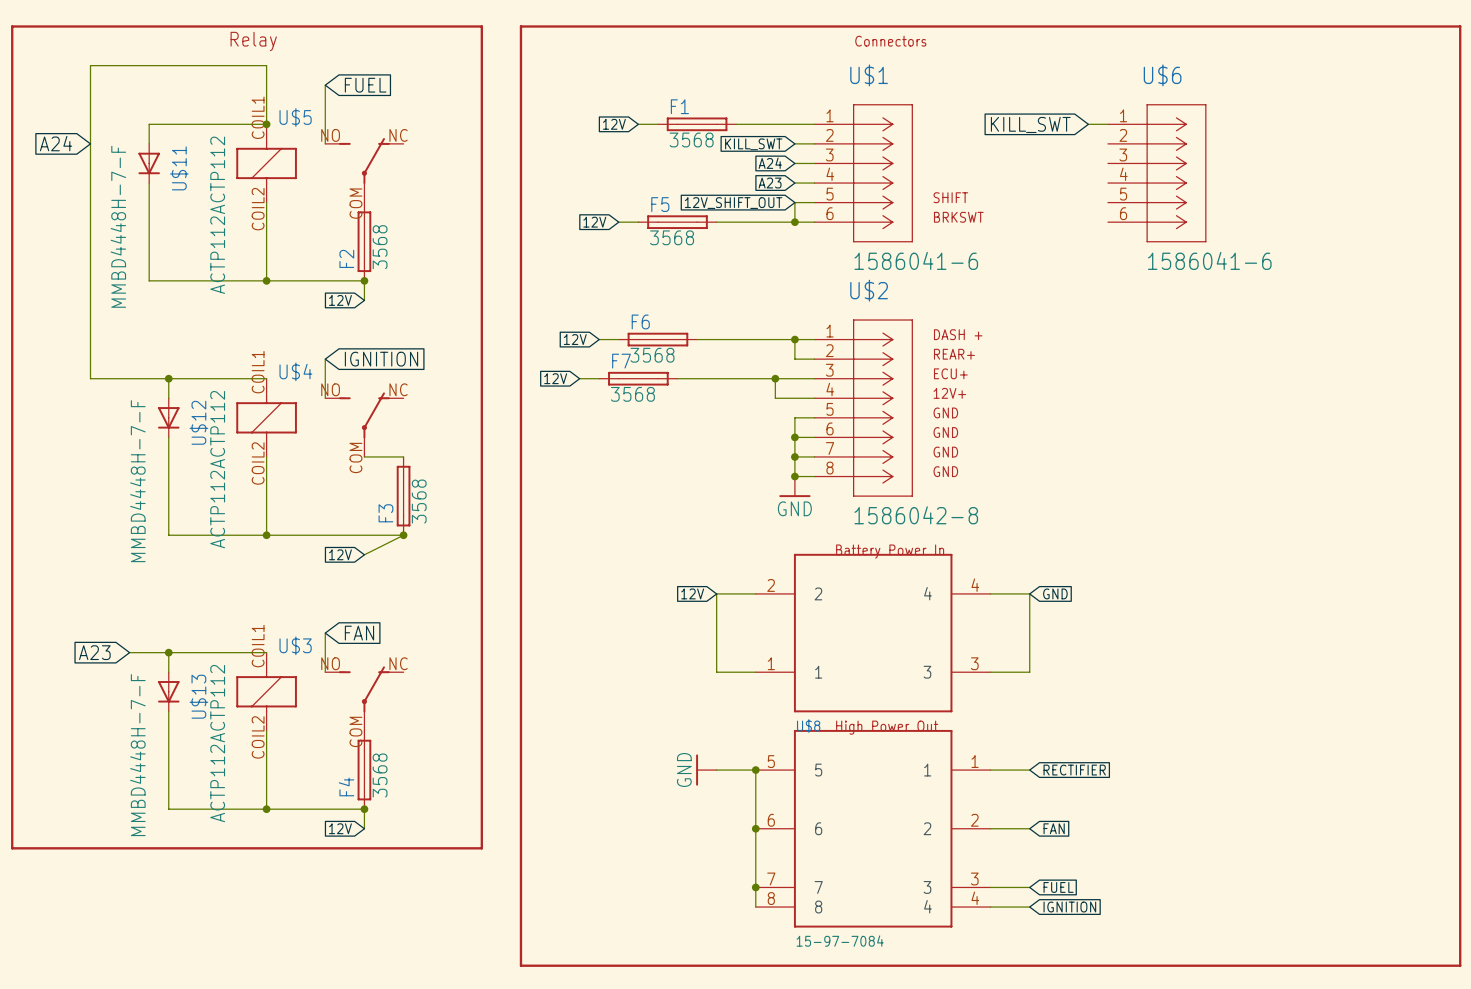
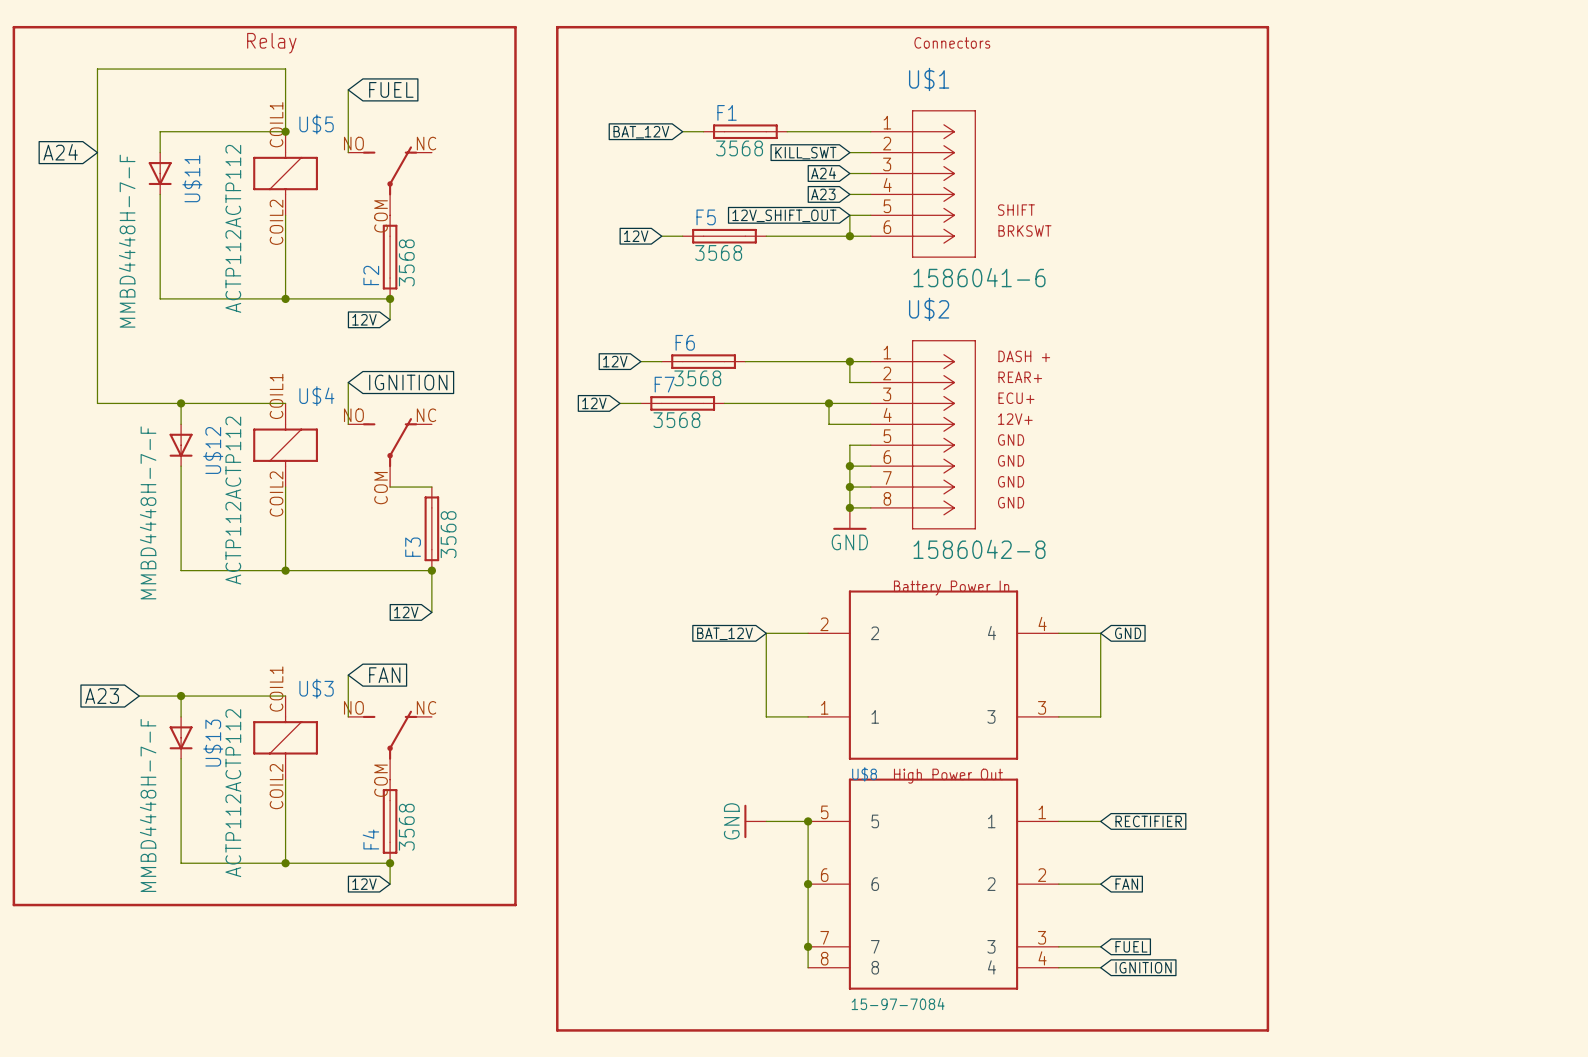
line: (1186, 26) (1460, 26) (1460, 965) (1186, 965) -> (1267, 27) (1267, 1030)
global label: 12V (614, 124) -> BAT_12V (641, 132)
global label: KILL_SWT (1030, 124) -> none
wire: (1088, 124) (1107, 124) -> none
U$6: 1586041-6 (1157, 173) -> none
wire: (403, 535) (364, 554) -> (431, 570) (431, 612)
global label position: 12V (340, 554) -> 12V (406, 612)
global label: 12V (692, 593) -> BAT_12V (724, 633)

